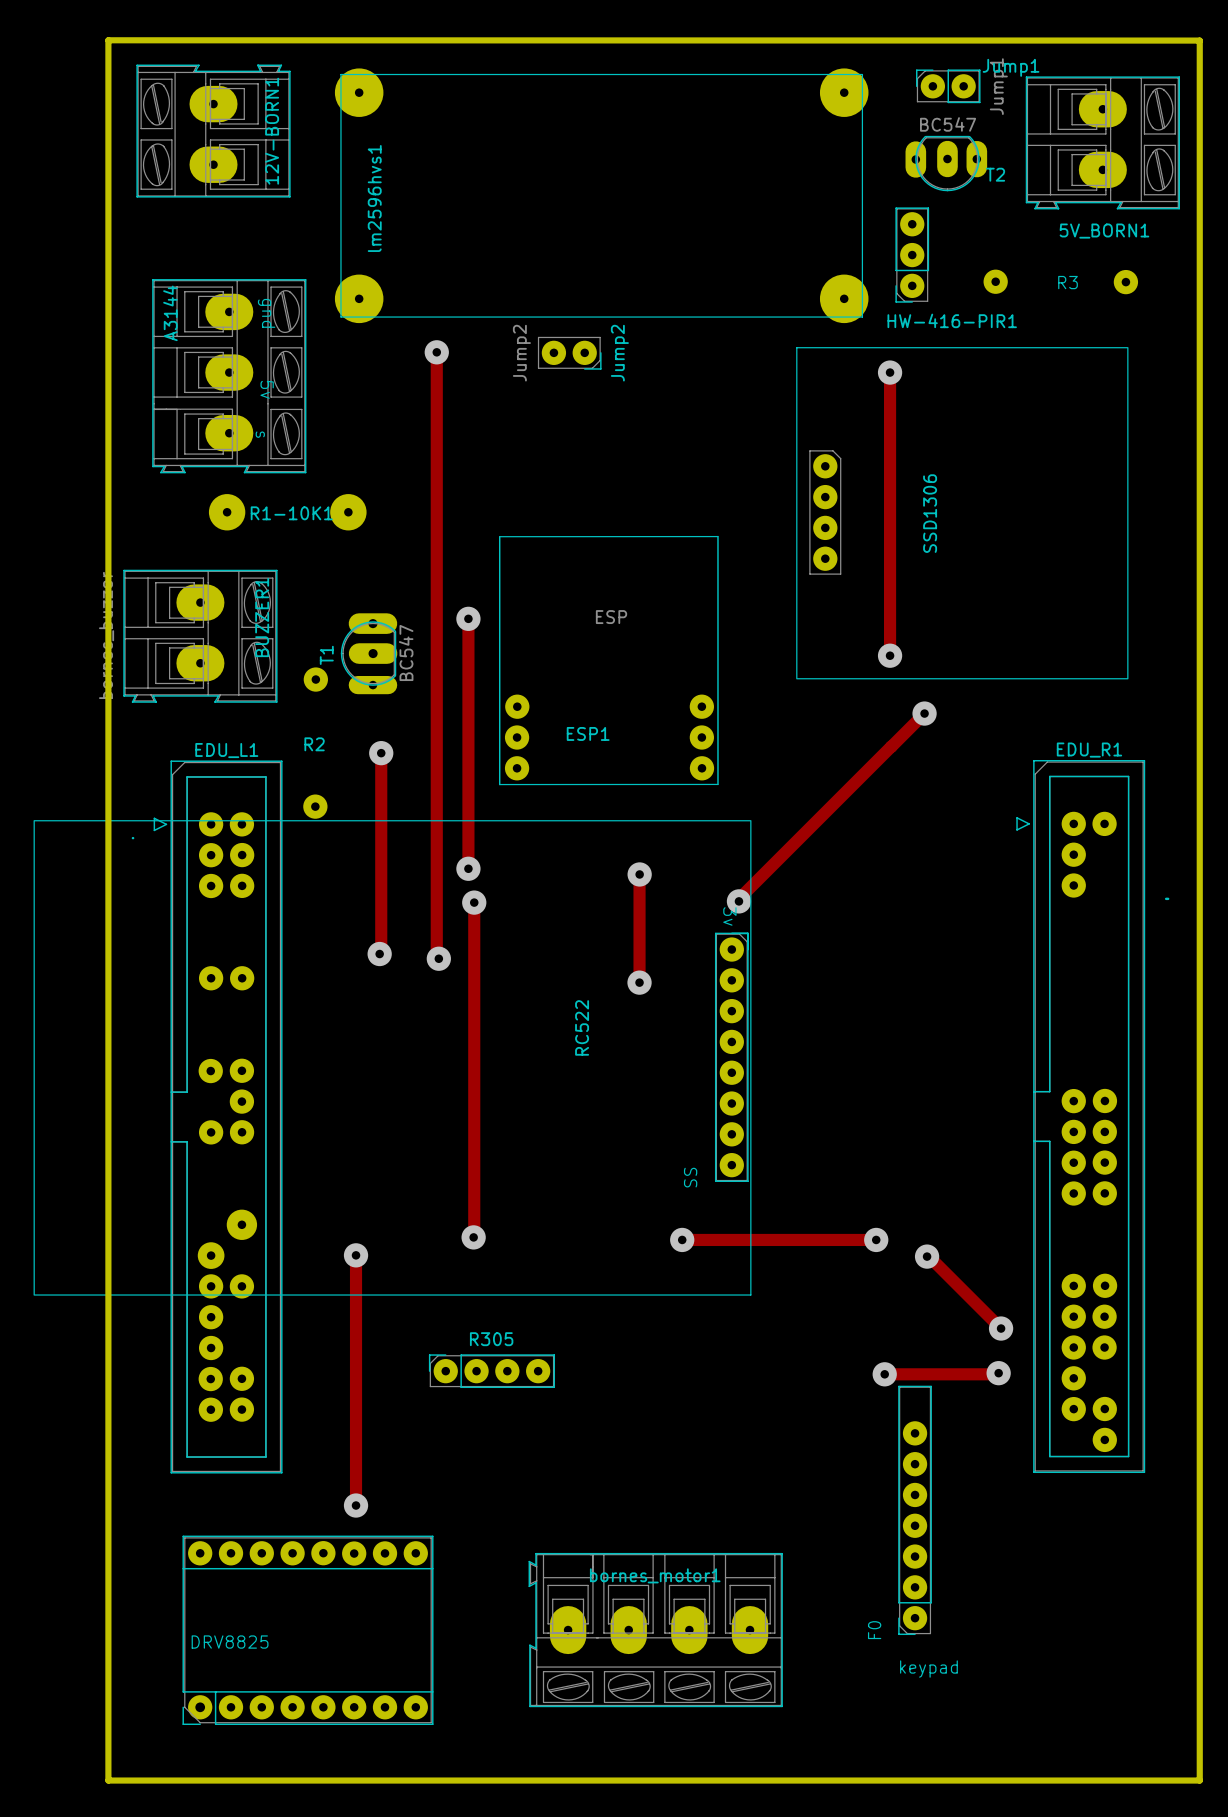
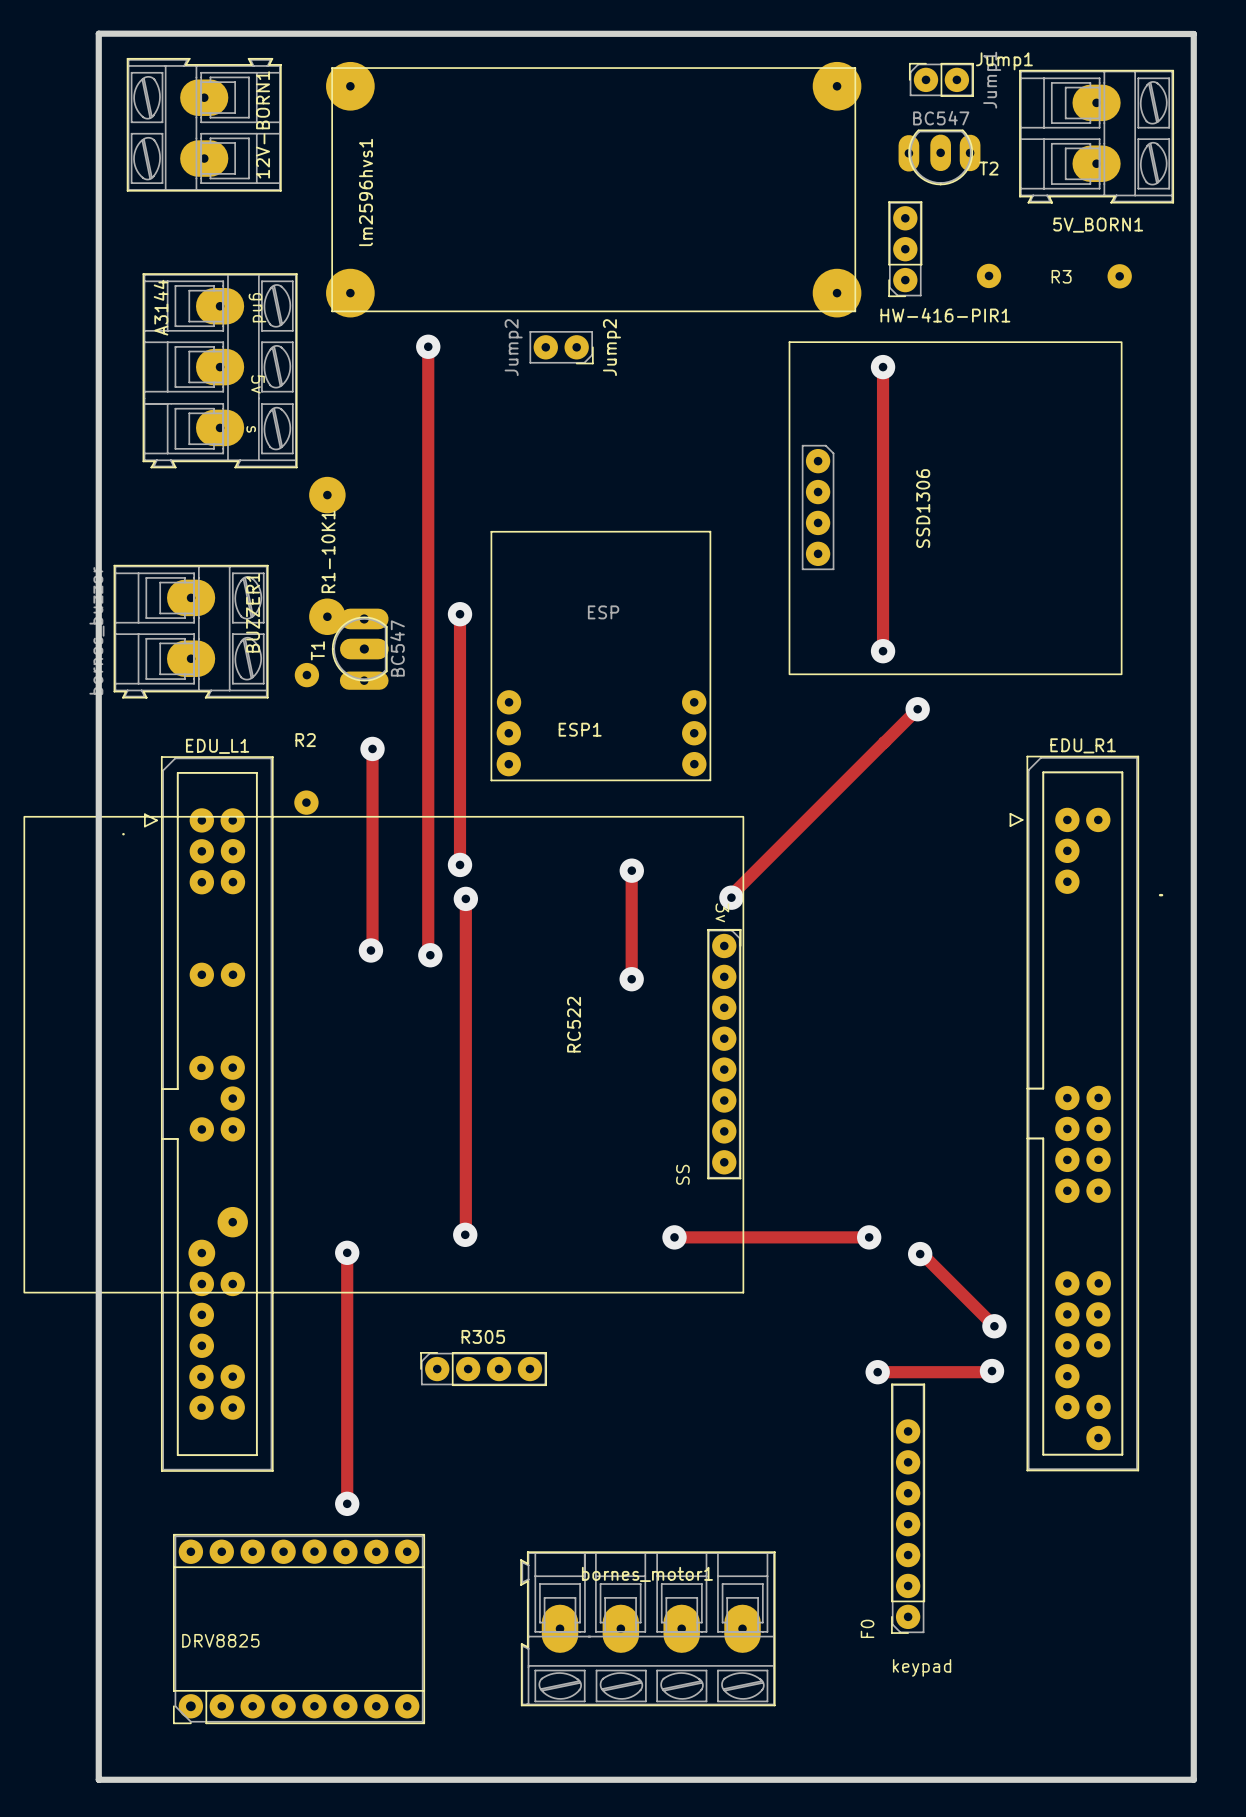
R1-10K1 rotation: 0° (287, 512) -> 90° clockwise (327, 555)

